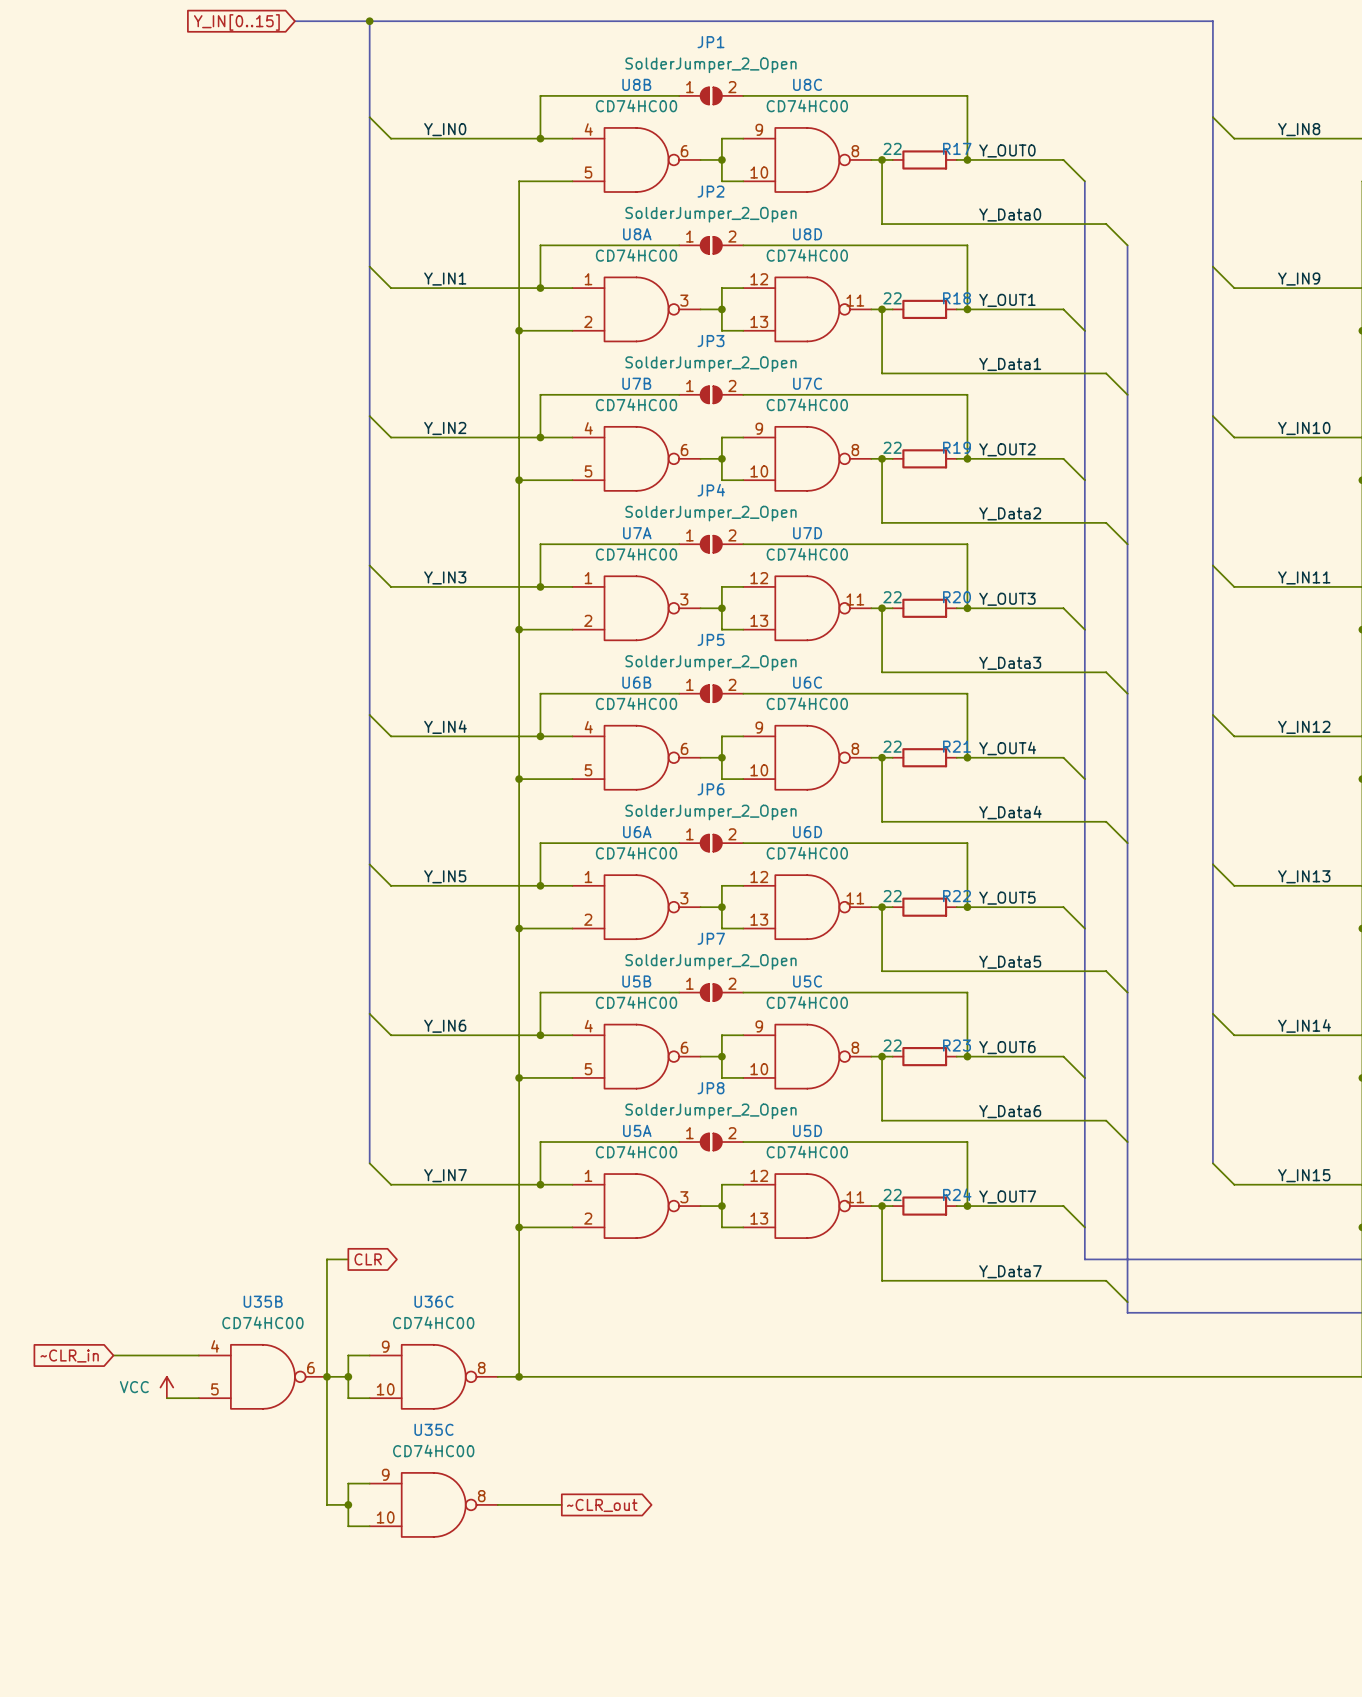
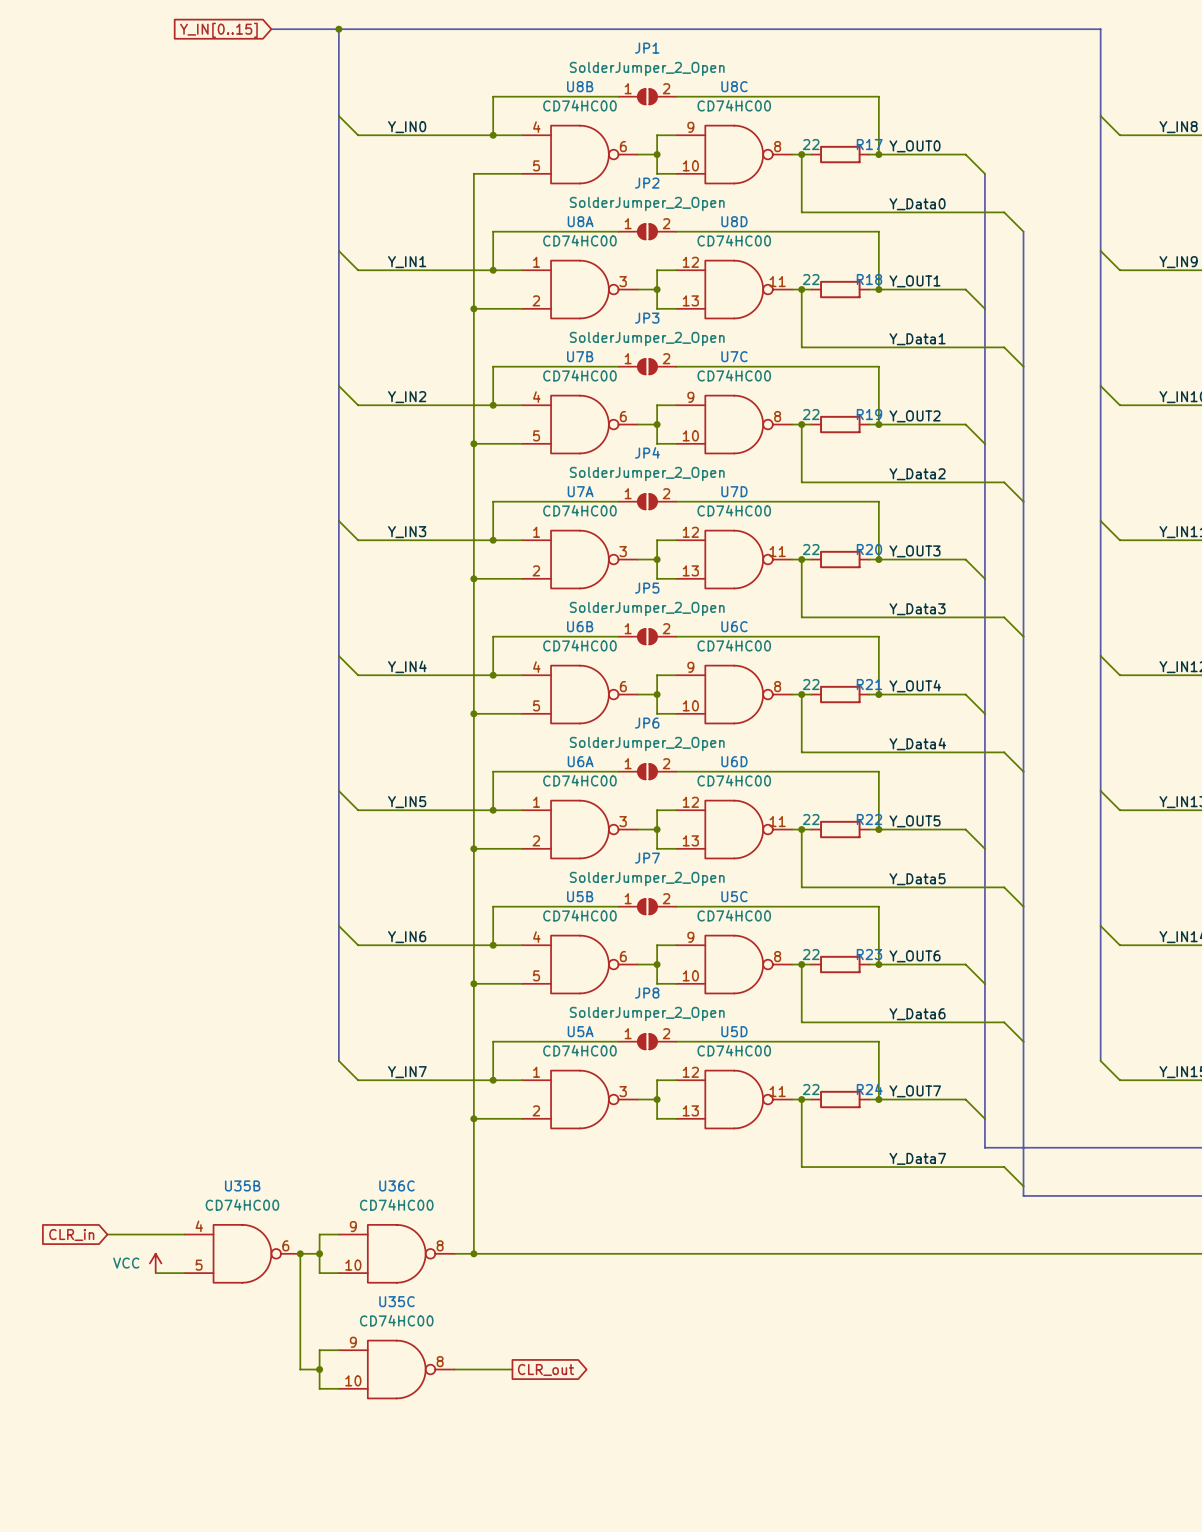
wire: (348, 1259) (326, 1259) (326, 1376) -> none
global label: CLR (368, 1259) -> none
global label: ~CLR_in (69, 1356) -> CLR_in (71, 1234)
global label: ~CLR_out (602, 1505) -> CLR_out (545, 1369)

